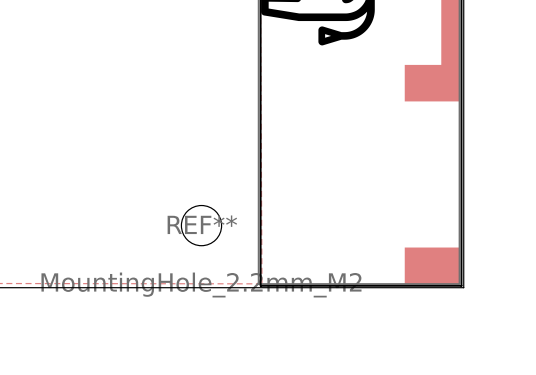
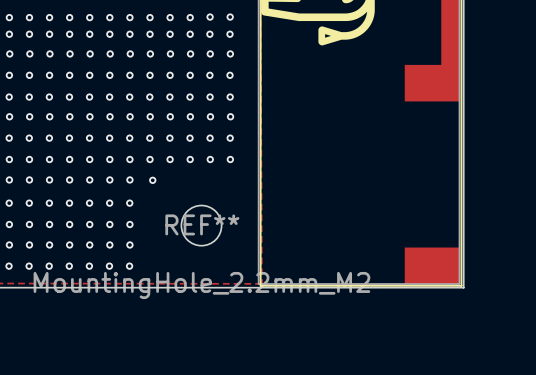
via: none -> (9, 17)
via: none -> (29, 17)
via: none -> (49, 17)
via: none -> (69, 17)
via: none -> (89, 17)
via: none -> (109, 17)
via: none -> (129, 17)
via: none -> (150, 17)
via: none -> (170, 17)
via: none -> (190, 17)
via: none -> (210, 17)
via: none -> (230, 17)
via: none -> (9, 34)
via: none -> (29, 34)
via: none -> (49, 34)
via: none -> (69, 34)
via: none -> (89, 34)
via: none -> (109, 34)
via: none -> (129, 34)
via: none -> (150, 34)
via: none -> (170, 34)
via: none -> (190, 34)
via: none -> (209, 34)
via: none -> (229, 34)
via: none -> (9, 53)
via: none -> (29, 53)
via: none -> (49, 53)
via: none -> (70, 53)
via: none -> (90, 53)
via: none -> (110, 53)
via: none -> (130, 53)
via: none -> (150, 53)
via: none -> (170, 53)
via: none -> (190, 53)
via: none -> (210, 53)
via: none -> (230, 53)
via: none -> (9, 75)
via: none -> (29, 75)
via: none -> (49, 75)
via: none -> (69, 75)
via: none -> (89, 75)
via: none -> (109, 75)
via: none -> (129, 75)
via: none -> (150, 75)
via: none -> (170, 75)
via: none -> (190, 75)
via: none -> (209, 75)
via: none -> (229, 75)
via: none -> (9, 97)
via: none -> (29, 97)
via: none -> (49, 97)
via: none -> (69, 97)
via: none -> (89, 97)
via: none -> (109, 97)
via: none -> (129, 97)
via: none -> (149, 97)
via: none -> (169, 97)
via: none -> (189, 97)
via: none -> (210, 97)
via: none -> (230, 97)
via: none -> (9, 116)
via: none -> (29, 116)
via: none -> (49, 116)
via: none -> (69, 116)
via: none -> (89, 116)
via: none -> (110, 116)
via: none -> (130, 116)
via: none -> (150, 116)
via: none -> (170, 116)
via: none -> (190, 116)
via: none -> (210, 116)
via: none -> (230, 116)
via: none -> (9, 138)
via: none -> (29, 138)
via: none -> (49, 138)
via: none -> (69, 138)
via: none -> (89, 138)
via: none -> (109, 138)
via: none -> (129, 138)
via: none -> (149, 138)
via: none -> (169, 138)
via: none -> (189, 138)
via: none -> (210, 138)
via: none -> (230, 138)
via: none -> (9, 159)
via: none -> (29, 159)
via: none -> (49, 159)
via: none -> (69, 159)
via: none -> (89, 159)
via: none -> (109, 159)
via: none -> (129, 159)
via: none -> (150, 159)
via: none -> (170, 159)
via: none -> (190, 159)
via: none -> (210, 159)
via: none -> (230, 159)
via: none -> (9, 179)
via: none -> (29, 179)
via: none -> (49, 179)
via: none -> (69, 179)
via: none -> (89, 179)
via: none -> (109, 179)
via: none -> (129, 179)
via: none -> (152, 180)
via: none -> (9, 203)
via: none -> (29, 203)
via: none -> (49, 203)
via: none -> (69, 203)
via: none -> (89, 203)
via: none -> (109, 203)
via: none -> (129, 203)
via: none -> (9, 224)
via: none -> (29, 224)
via: none -> (49, 224)
via: none -> (69, 224)
via: none -> (89, 224)
via: none -> (109, 224)
via: none -> (129, 224)
via: none -> (9, 244)
via: none -> (29, 244)
via: none -> (49, 244)
via: none -> (69, 244)
via: none -> (89, 244)
via: none -> (109, 244)
via: none -> (129, 244)
via: none -> (9, 266)
via: none -> (29, 266)
via: none -> (49, 266)
via: none -> (69, 266)
via: none -> (89, 266)
via: none -> (109, 266)
via: none -> (129, 266)

